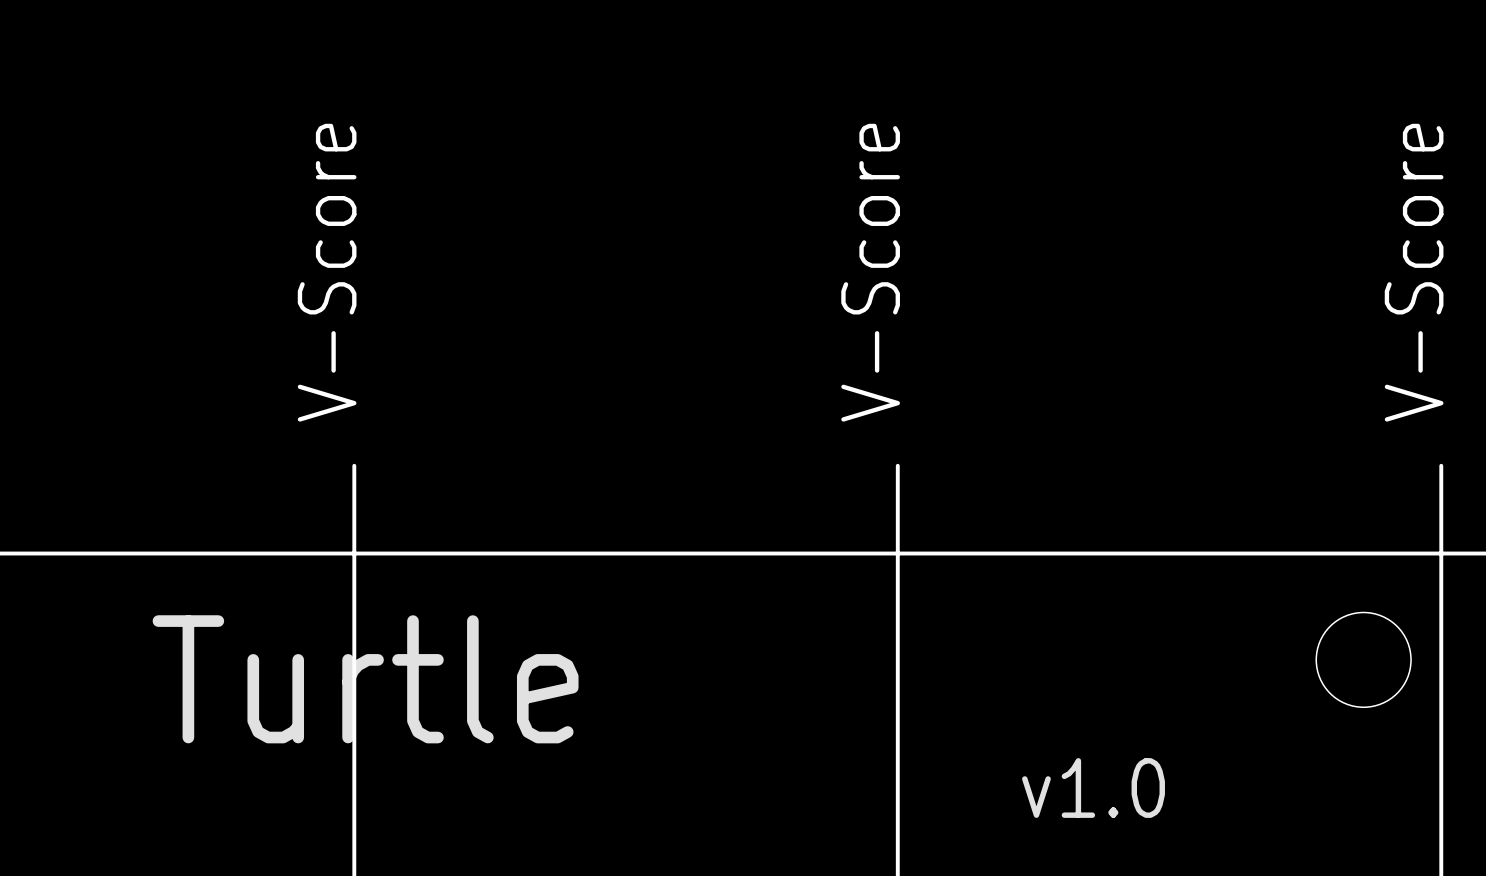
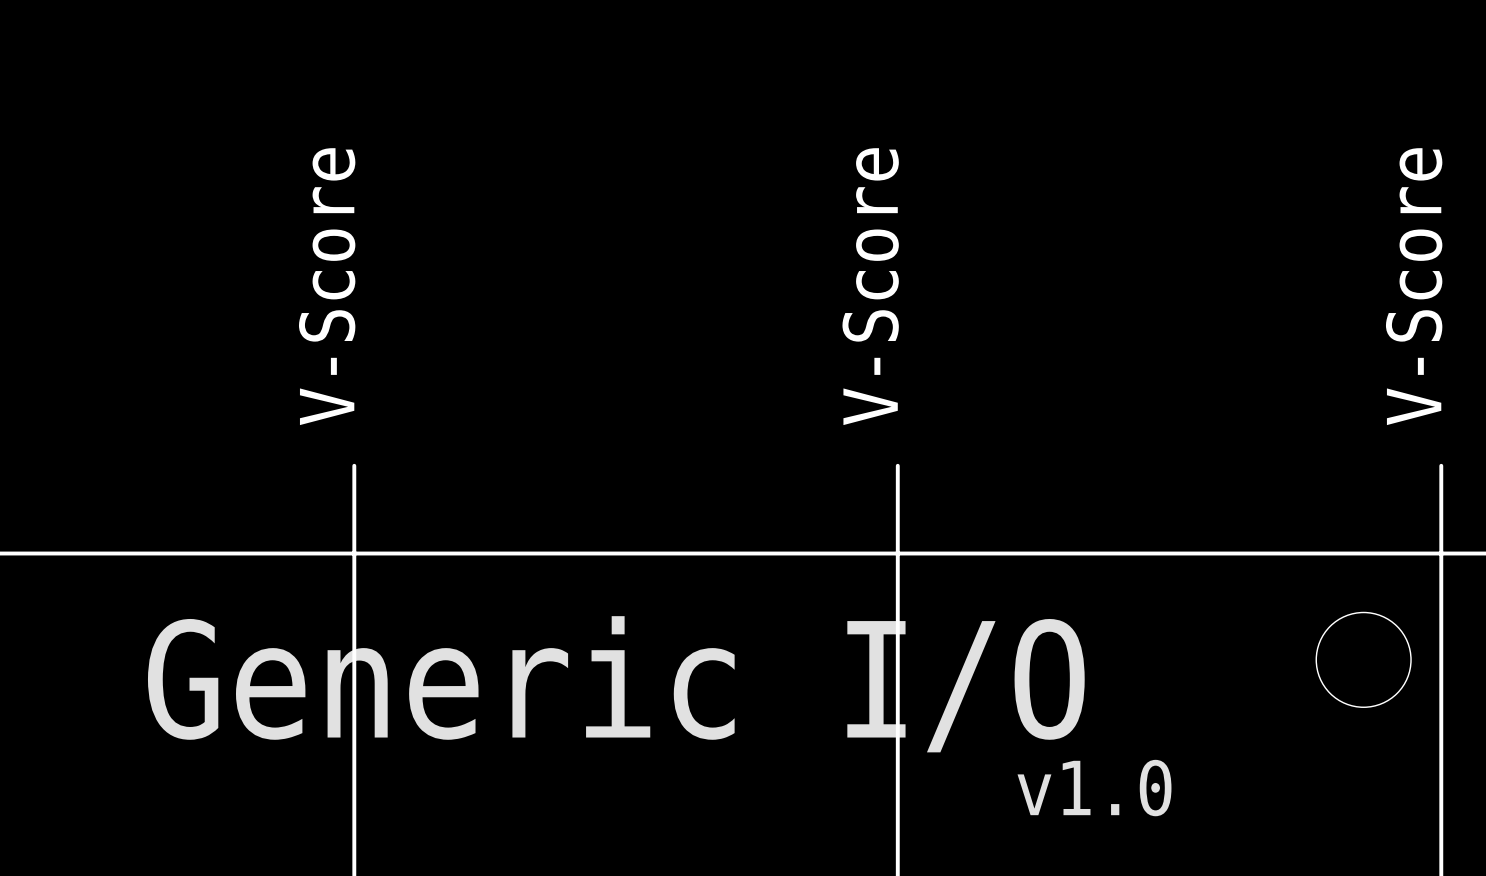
text: Turtle (365, 679) -> Generic I/O (616, 684)

